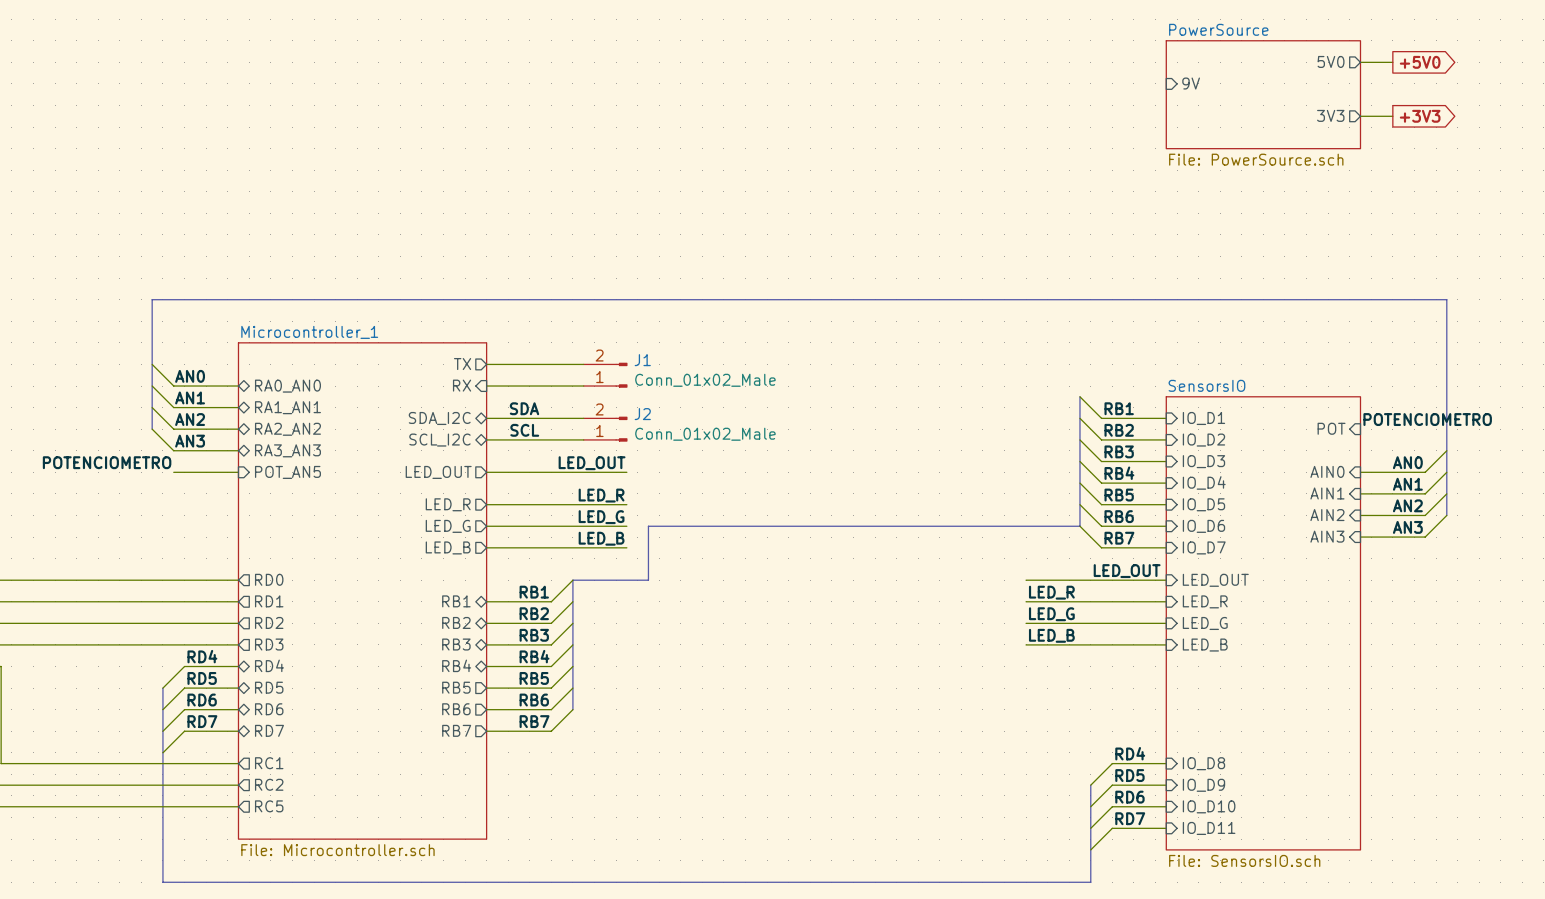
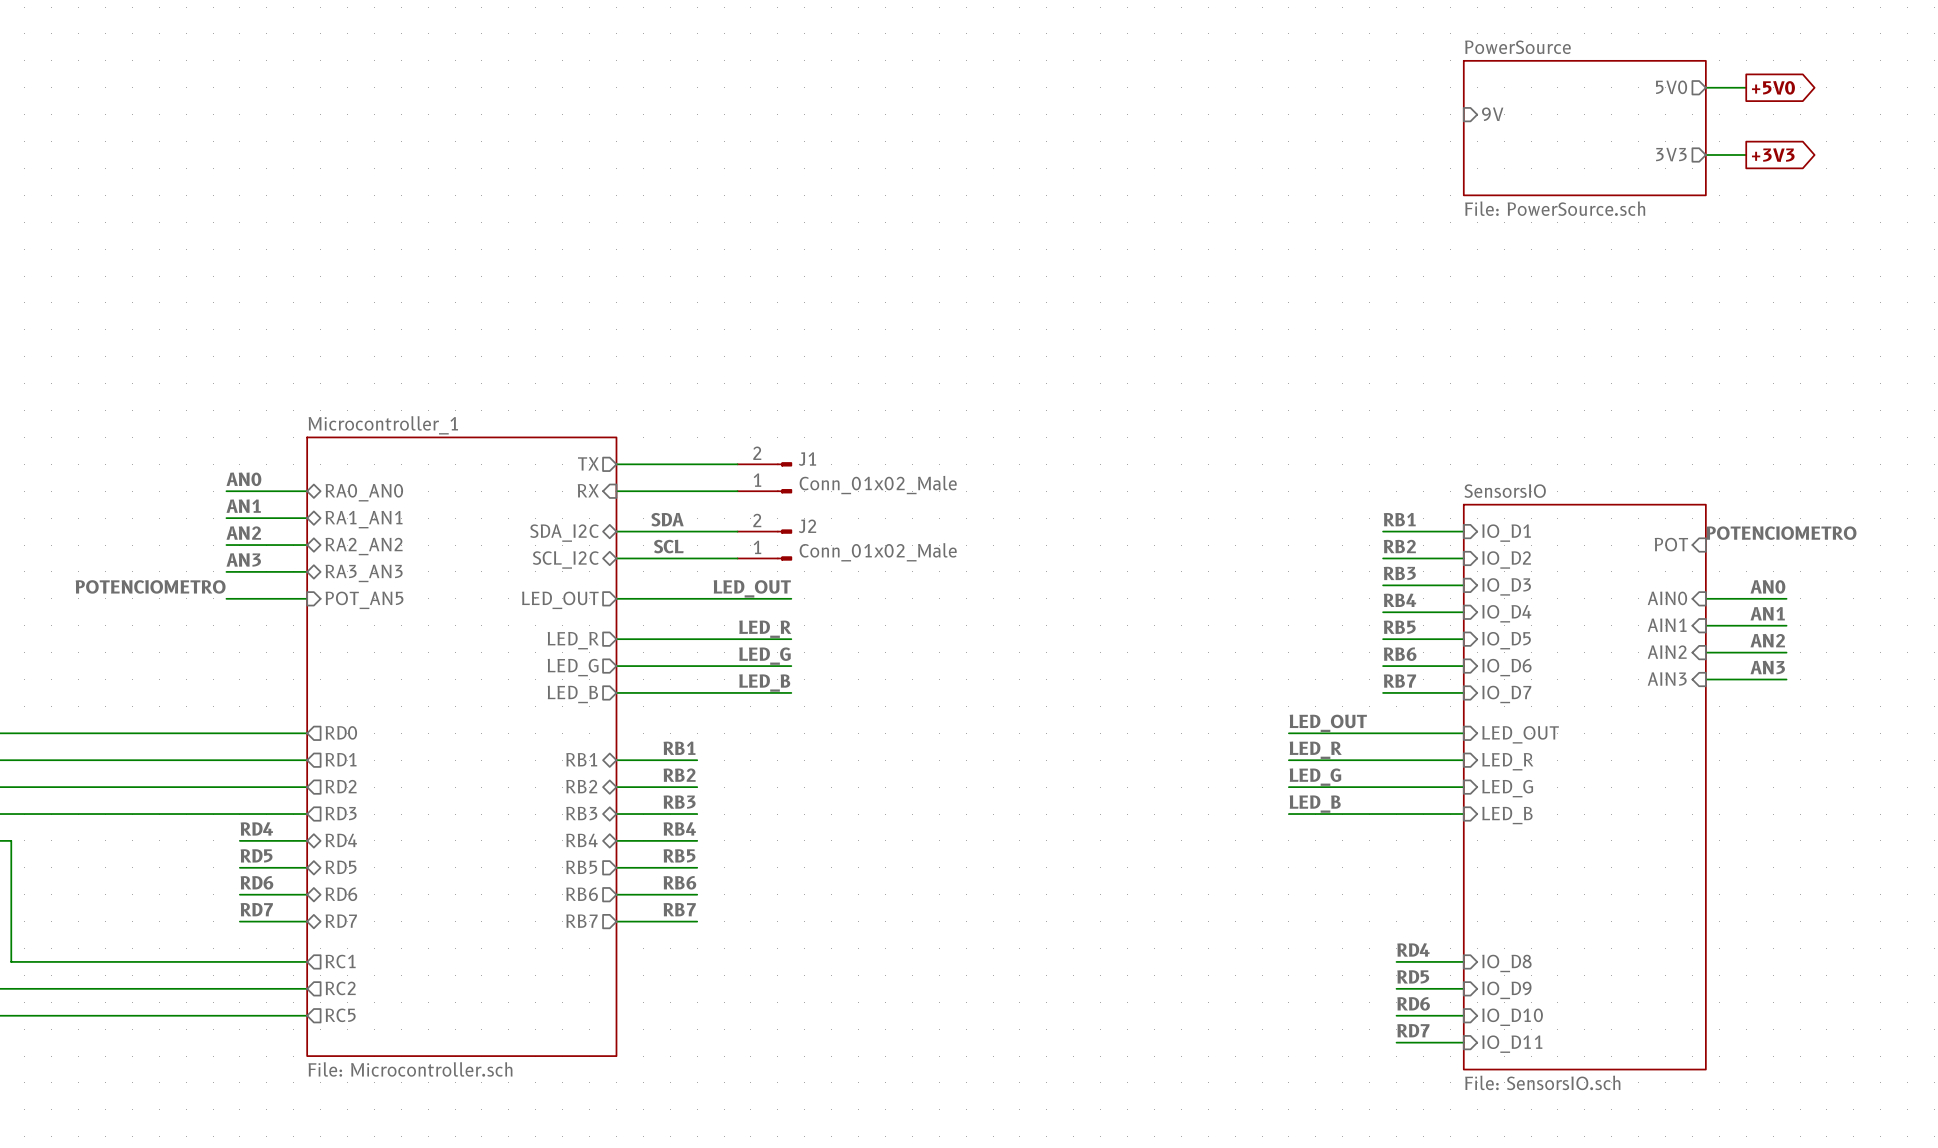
wire: (152, 364) (173, 386) -> none
wire: (152, 386) (173, 407) -> none
wire: (1079, 396) (1101, 418) -> none
bus: (1079, 396) (1079, 526) (648, 526) (648, 580) (572, 580) (572, 709) -> none
wire: (152, 407) (173, 429) -> none
wire: (1079, 418) (1101, 439) -> none
wire: (152, 429) (173, 450) -> none
bus: (152, 429) (152, 299) (1446, 299) (1446, 515) -> none
wire: (1079, 439) (1101, 461) -> none
wire: (1446, 450) (1425, 472) -> none
wire: (1079, 461) (1101, 483) -> none
wire: (1446, 472) (1425, 493) -> none
wire: (1079, 483) (1101, 504) -> none
wire: (1446, 493) (1425, 515) -> none
wire: (1079, 504) (1101, 526) -> none
wire: (1446, 515) (1425, 537) -> none
wire: (1079, 526) (1101, 547) -> none
label position: LED_OUT (1127, 571) -> LED_OUT (1328, 723)
wire: (572, 580) (551, 601) -> none
wire: (572, 601) (551, 623) -> none
wire: (572, 623) (551, 644) -> none
wire: (572, 644) (551, 666) -> none
wire: (184, 666) (162, 688) -> none
wire: (572, 666) (551, 688) -> none
bus: (162, 688) (162, 882) (1090, 882) (1090, 785) -> none
wire: (184, 688) (162, 709) -> none
wire: (572, 688) (551, 709) -> none
wire: (184, 709) (162, 731) -> none
wire: (572, 709) (551, 731) -> none
wire: (184, 731) (162, 752) -> none
wire: (1112, 763) (1090, 785) -> none
wire: (1112, 785) (1090, 806) -> none
wire: (1112, 806) (1090, 828) -> none
wire: (1112, 828) (1090, 849) -> none

